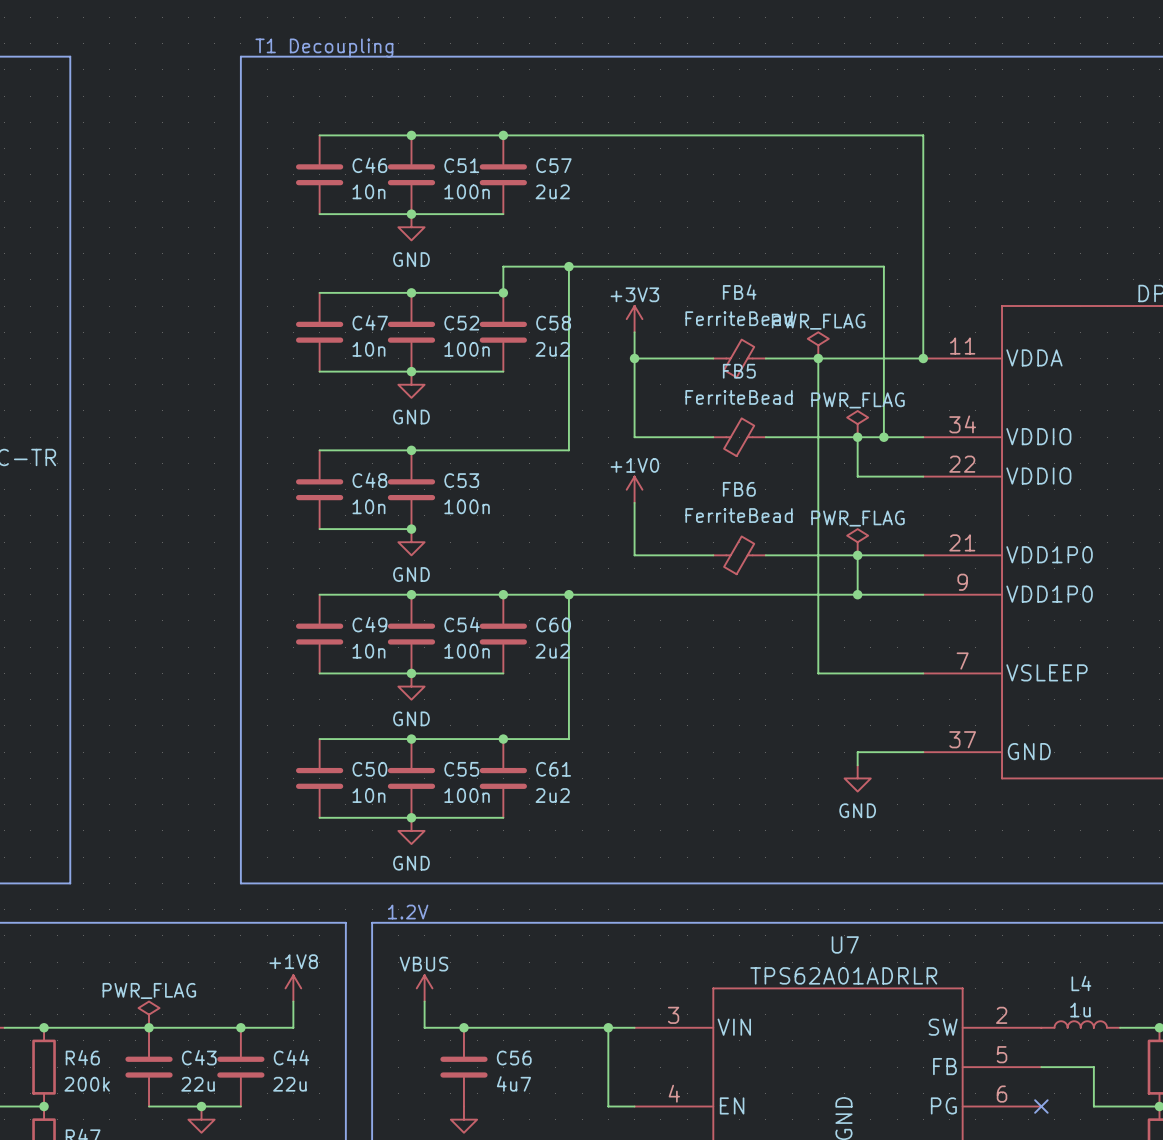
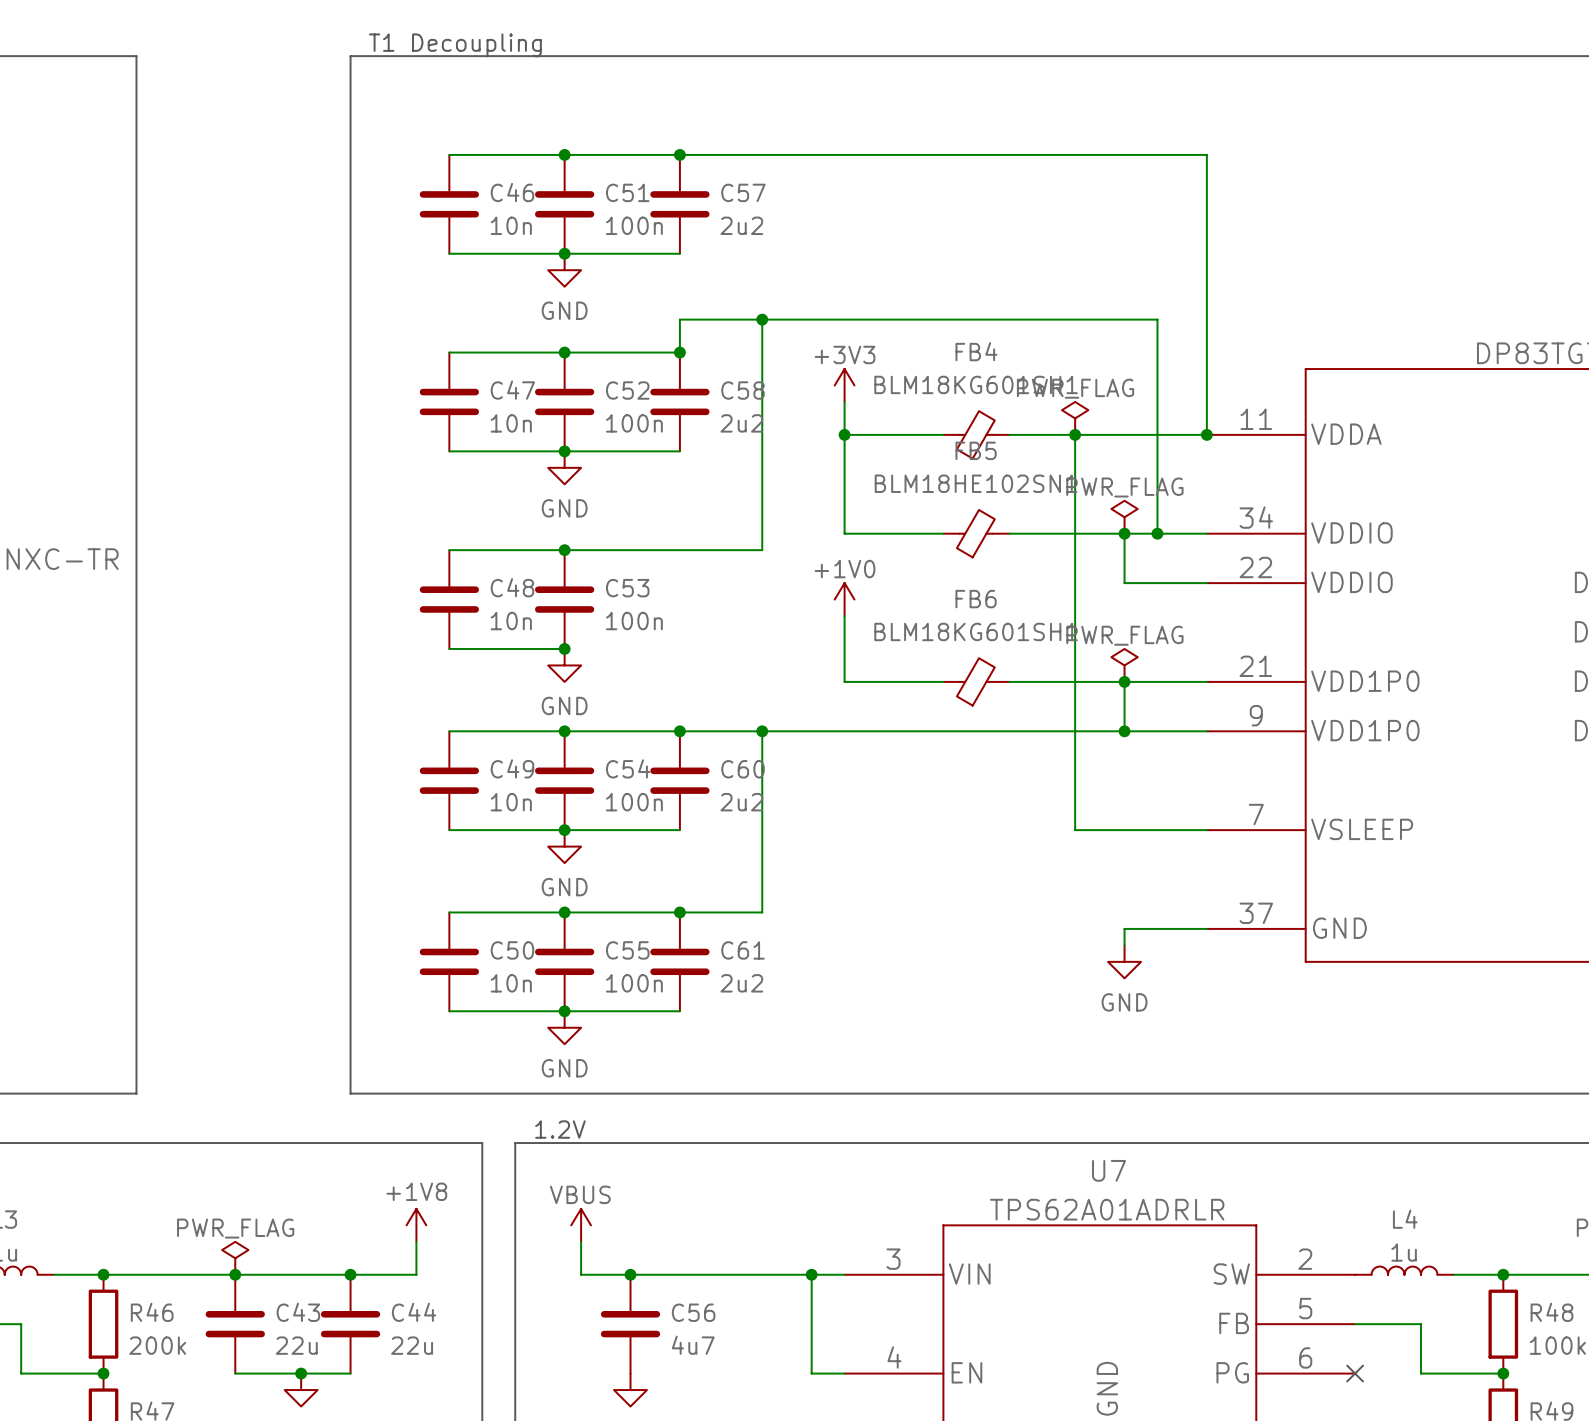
FB4 value: FerriteBead (739, 318) -> BLM18KG601SH1 (976, 384)
FB5 value: FerriteBead (739, 397) -> BLM18HE102SN1 (976, 483)
FB6 value: FerriteBead (739, 515) -> BLM18KG601SH1 (976, 631)

